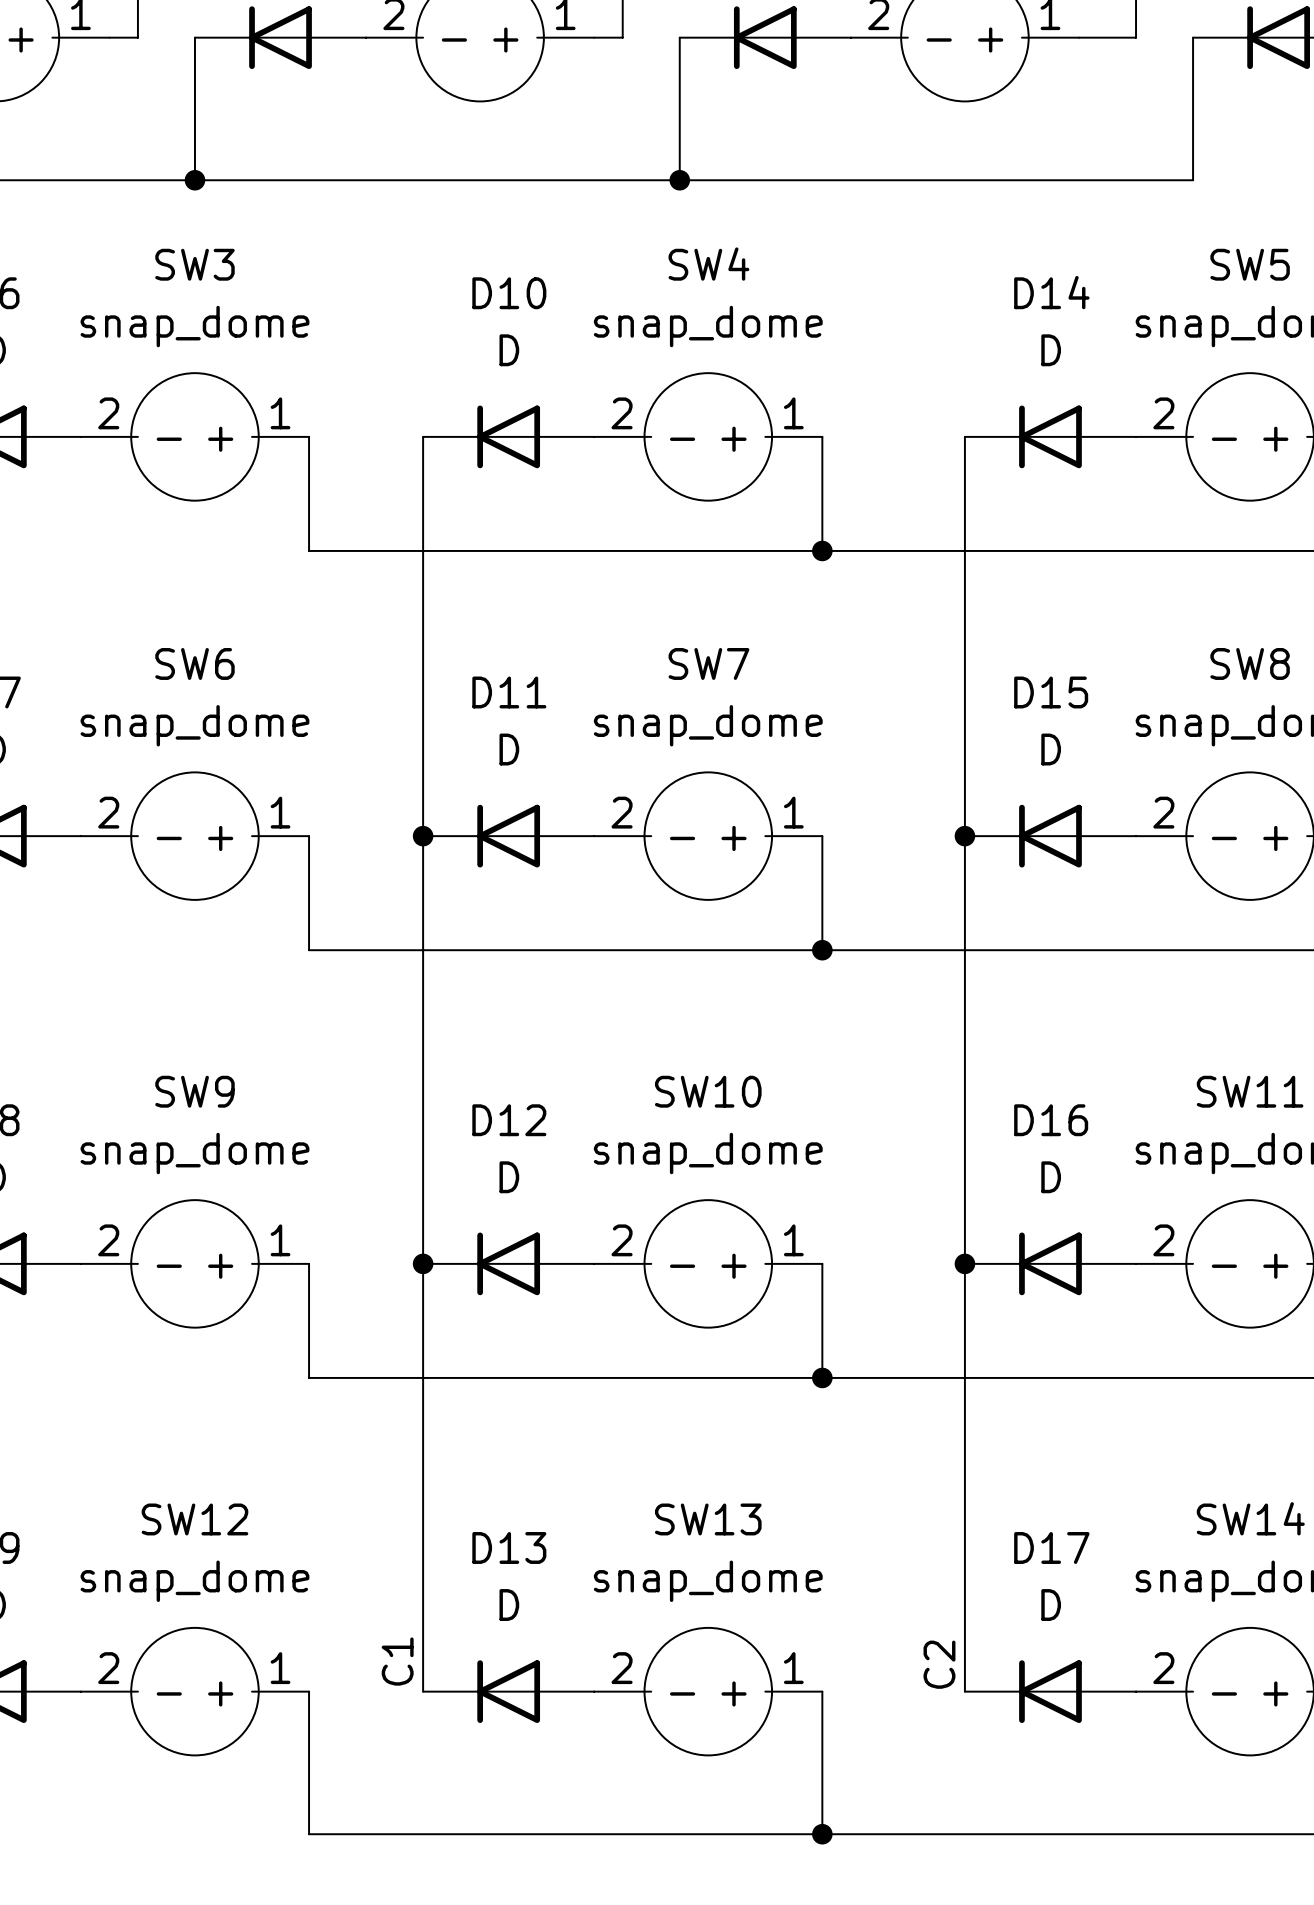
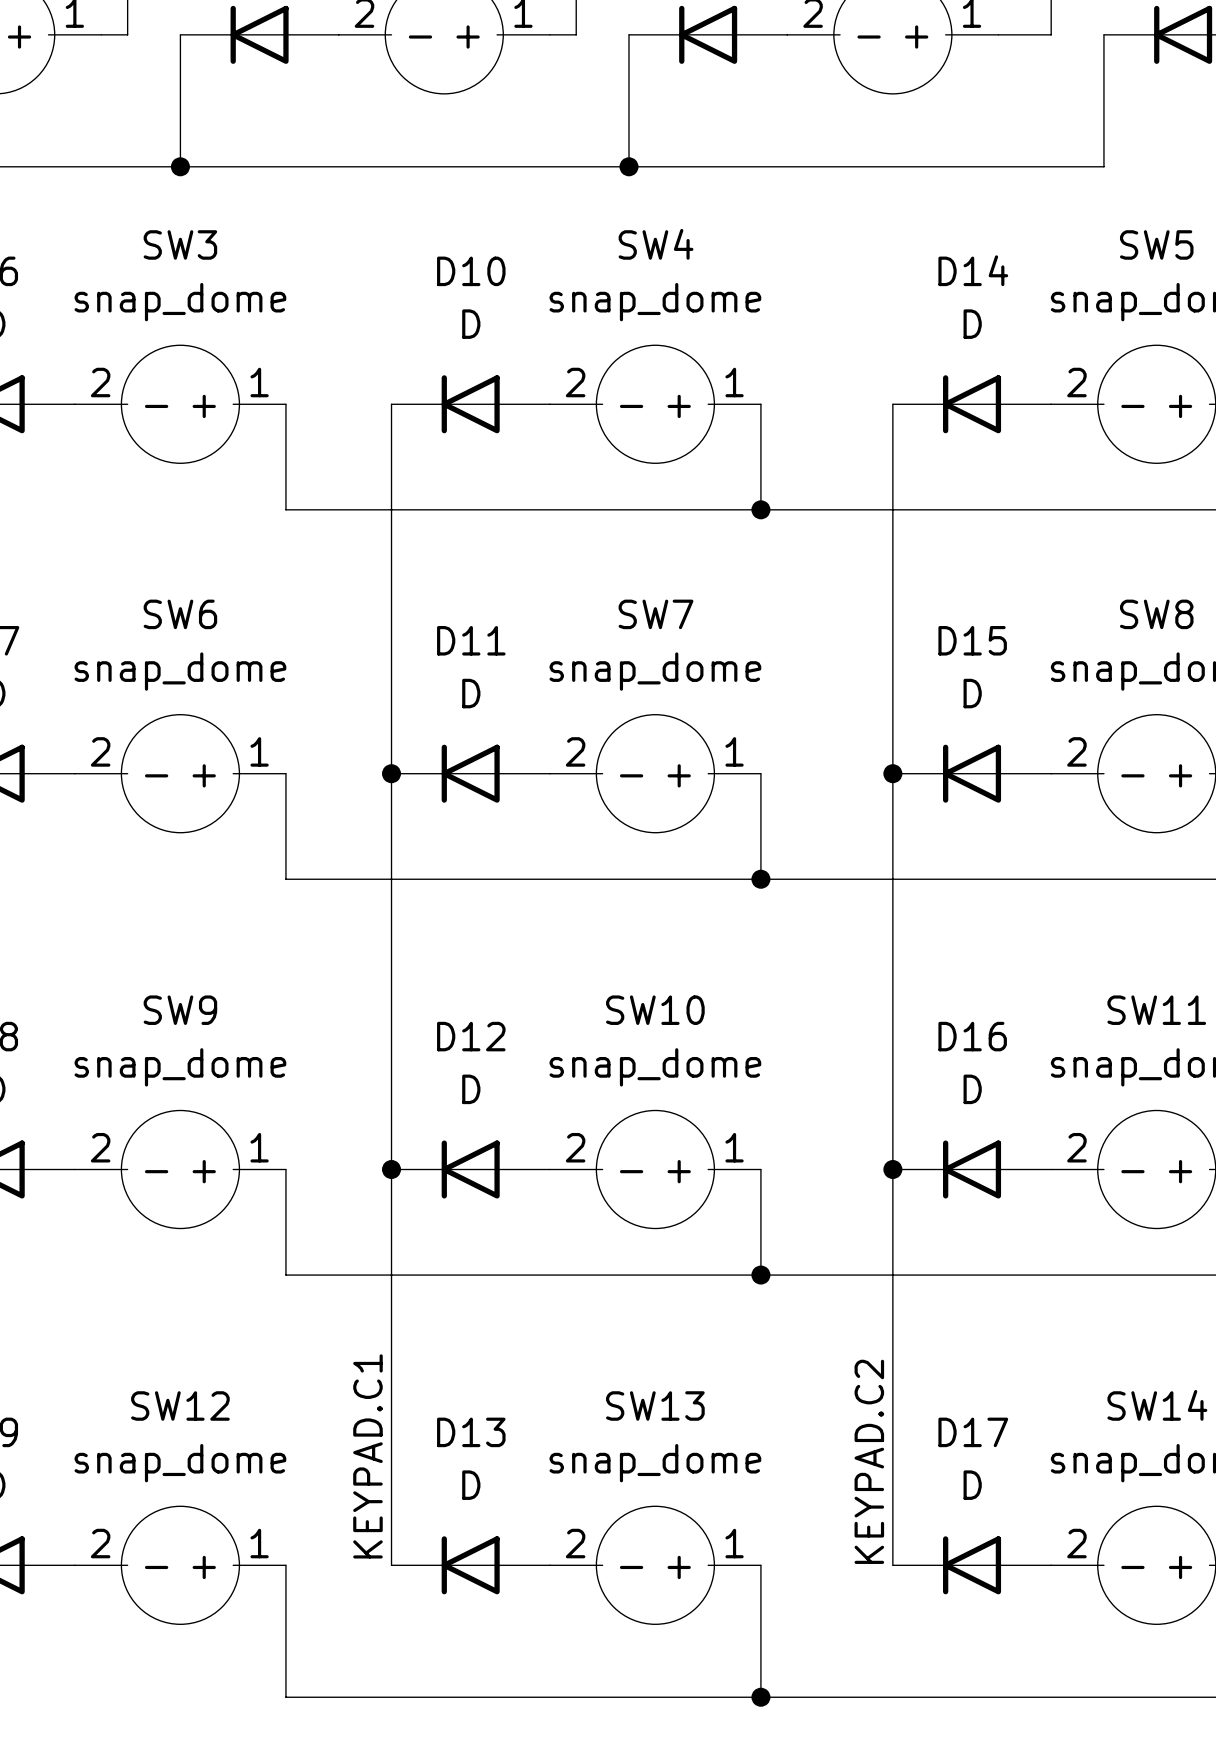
label: none -> KEYPAD.C2 (869, 1461)
label: C1 (397, 1661) -> KEYPAD.C1 (367, 1456)
label: C2 (939, 1664) -> none

